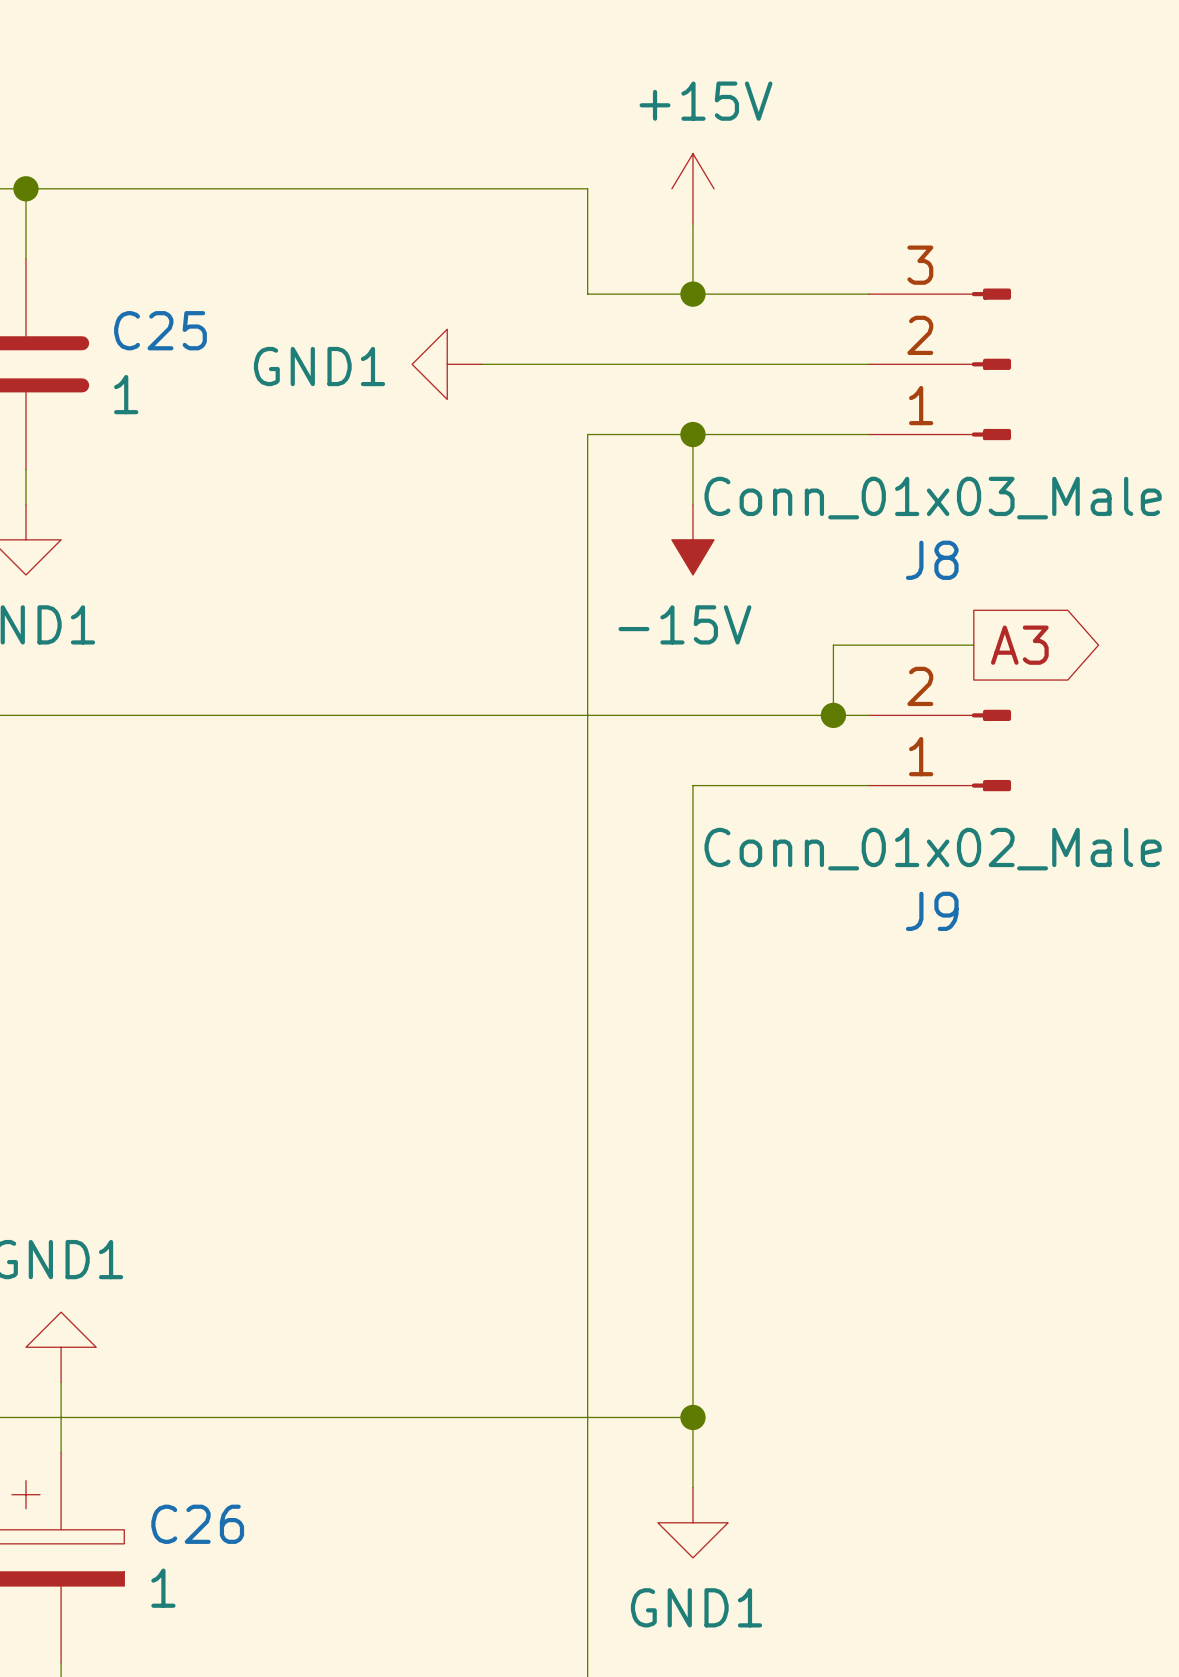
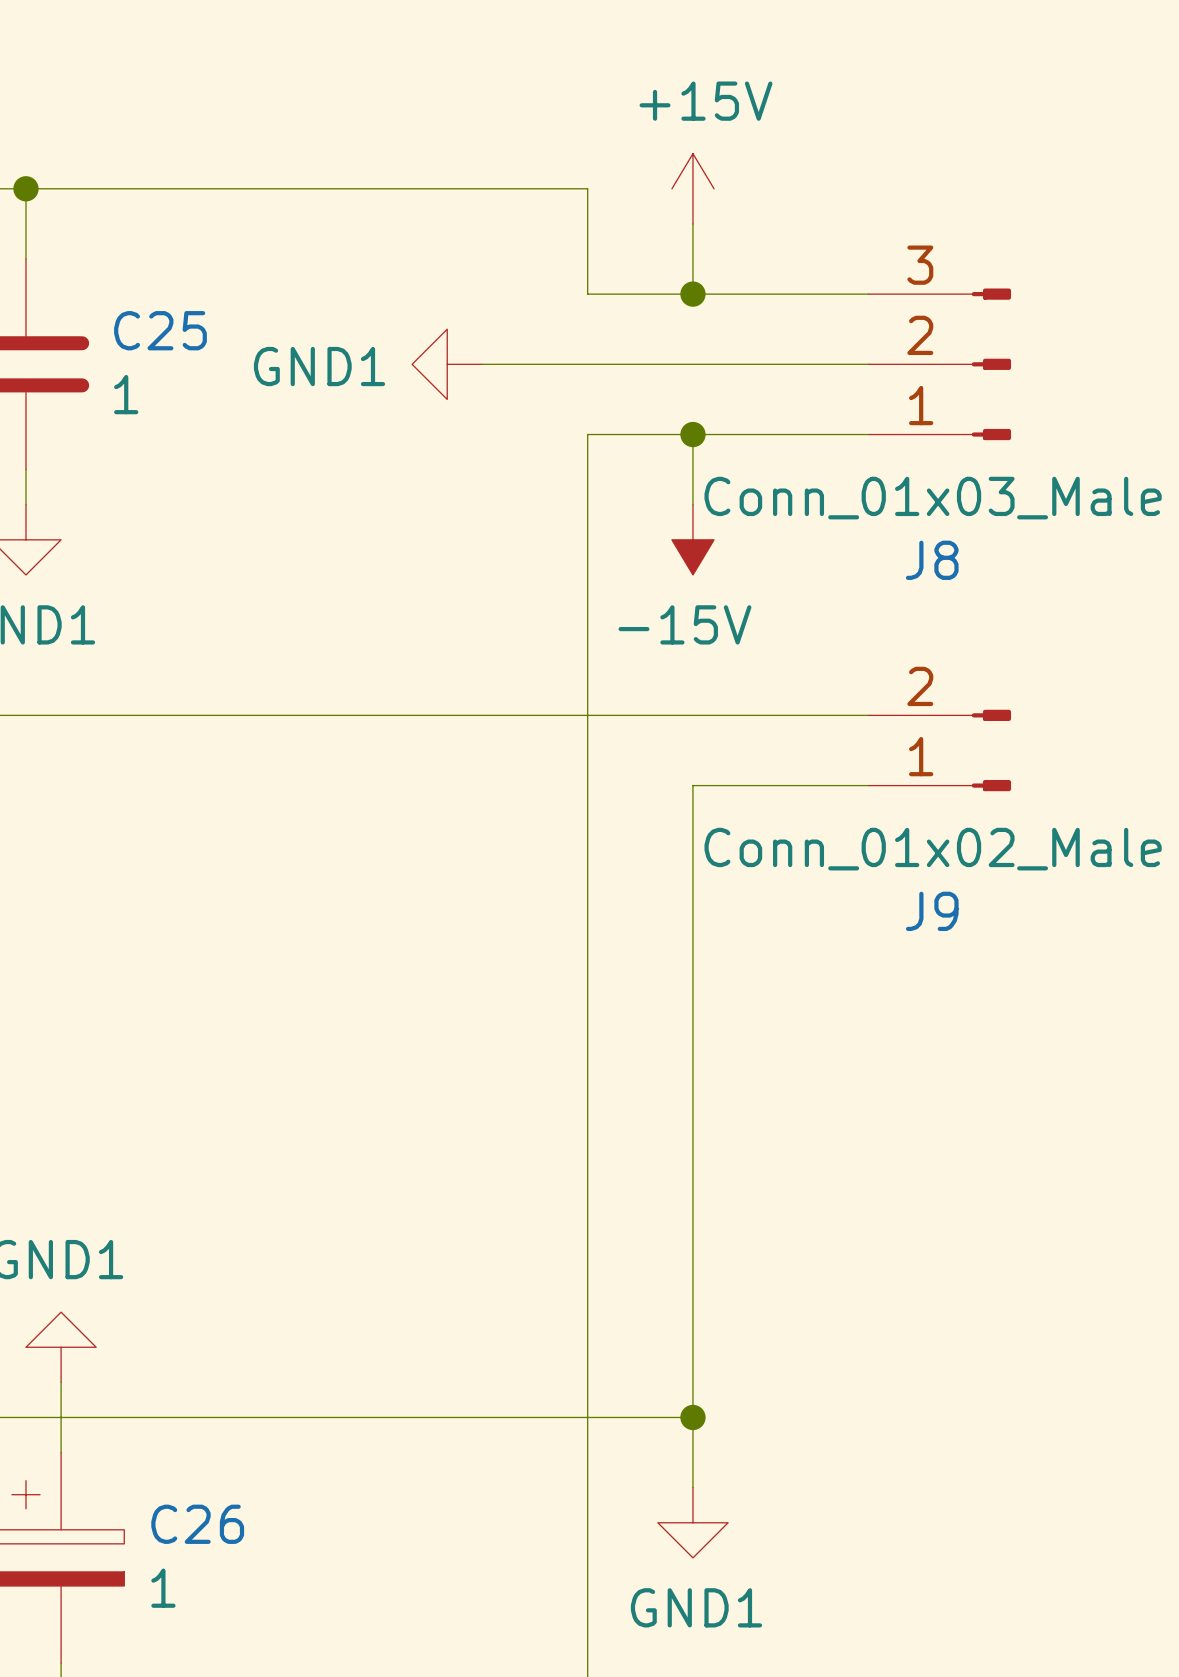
wire: (973, 645) (833, 645) (833, 715) -> none
global label: A3 (1019, 645) -> none
junction: (833, 715) -> none

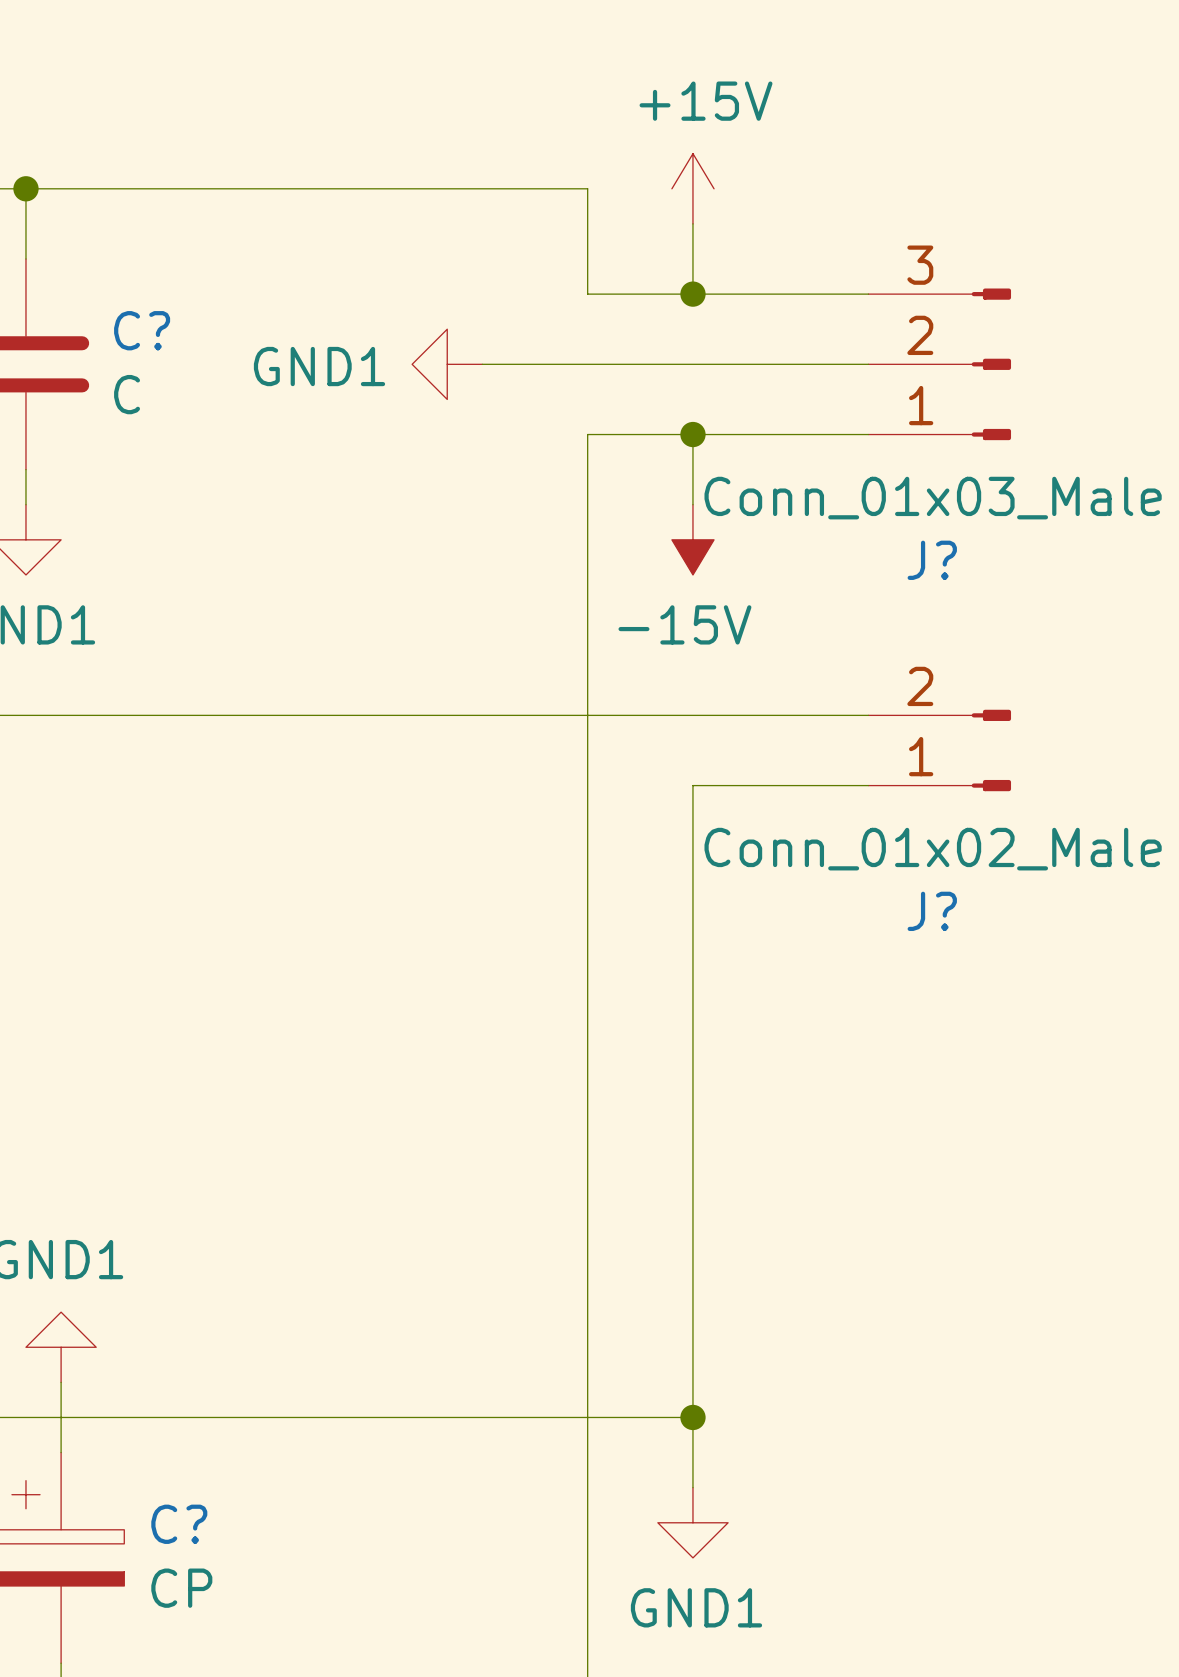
C25 name: C25 (160, 330) -> C? (142, 330)
C25 value: 1 (126, 394) -> C (127, 394)
J8 name: J8 (932, 560) -> J? (932, 560)
J9 name: J9 (932, 911) -> J? (932, 911)
C26 name: C26 (197, 1524) -> C? (179, 1524)
C26 value: 1 (163, 1588) -> CP (181, 1588)

